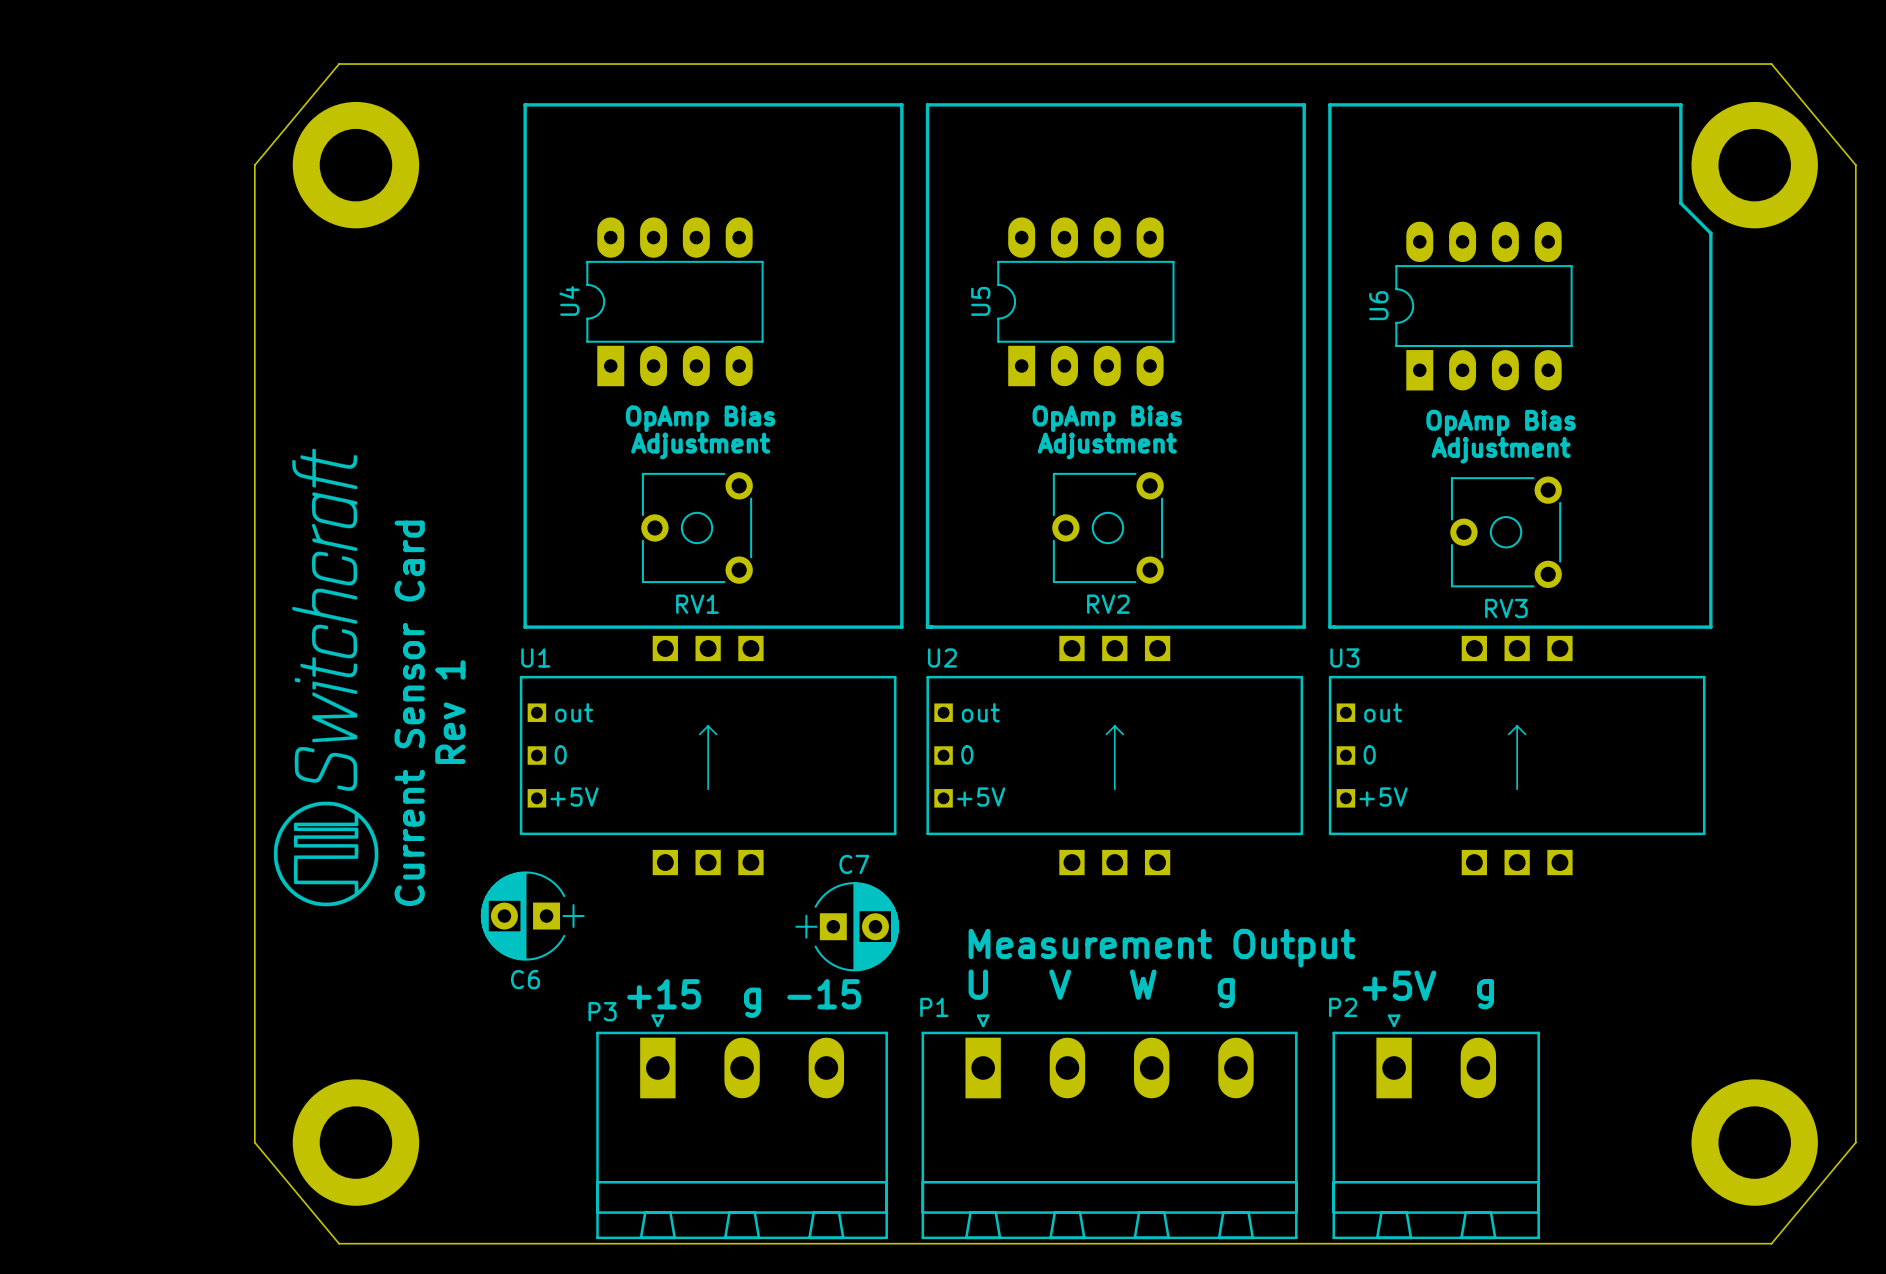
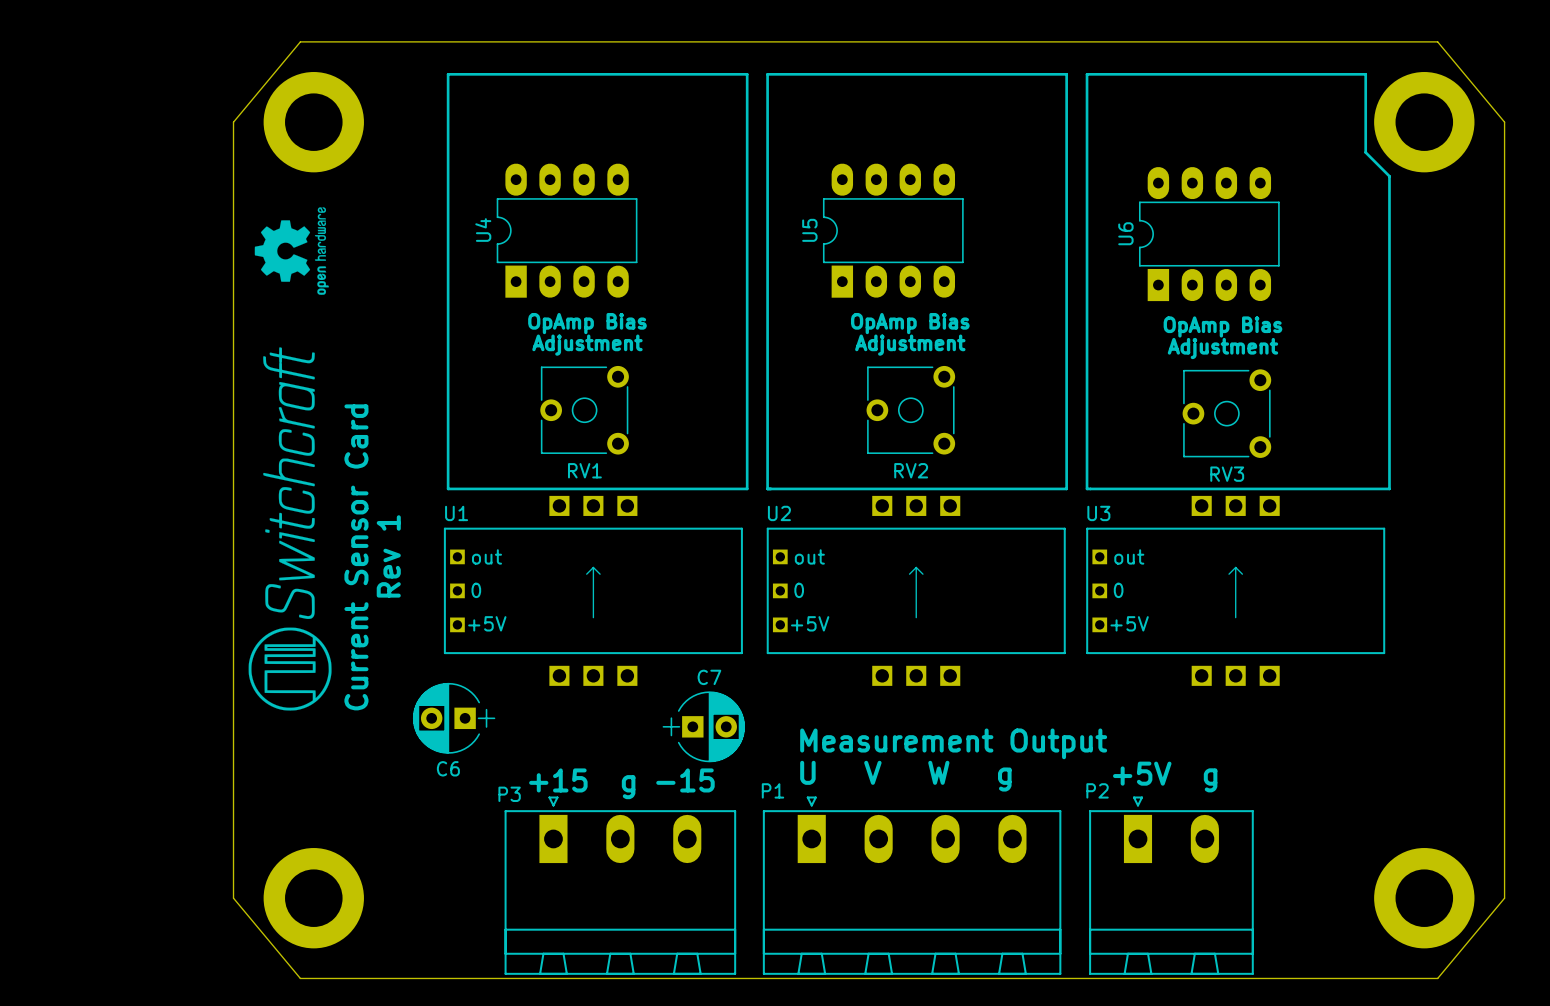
drawing: none -> [254, 207, 329, 295]

